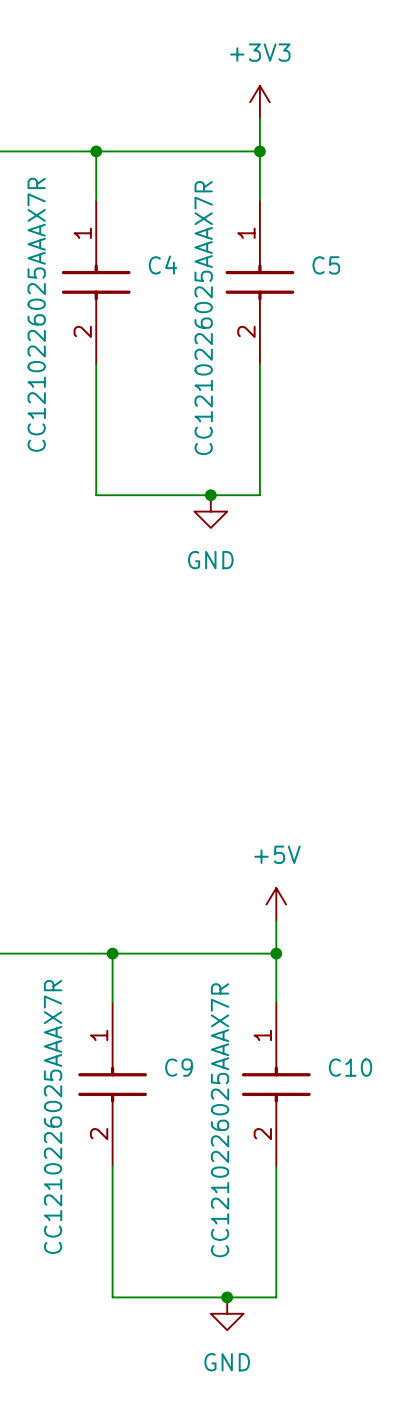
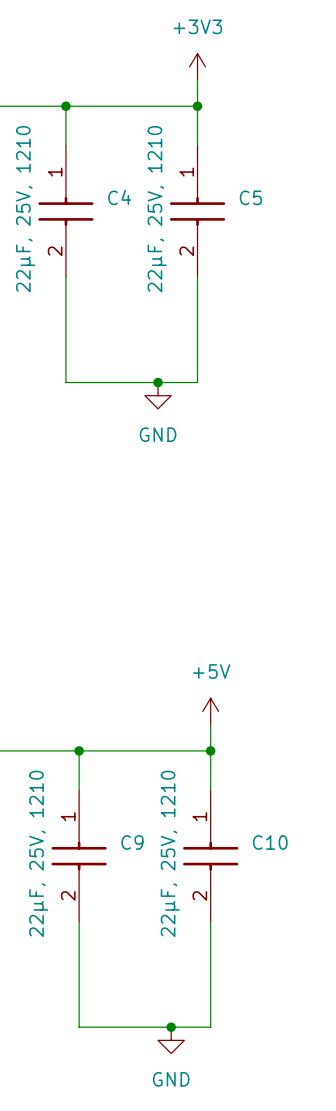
C4 text: none -> 22µF, 25V, 1210 (25, 209)
C5 text: none -> 22µF, 25V, 1210 (157, 209)
C4 value: CC1210226025AAAX7R (36, 314) -> none
C5 value: CC1210226025AAAX7R (203, 318) -> none
C9 text: none -> 22µF, 25V, 1210 (38, 853)
C10 text: none -> 22µF, 25V, 1210 (170, 853)
C9 value: CC1210226025AAAX7R (53, 1116) -> none
C10 value: CC1210226025AAAX7R (220, 1120) -> none

